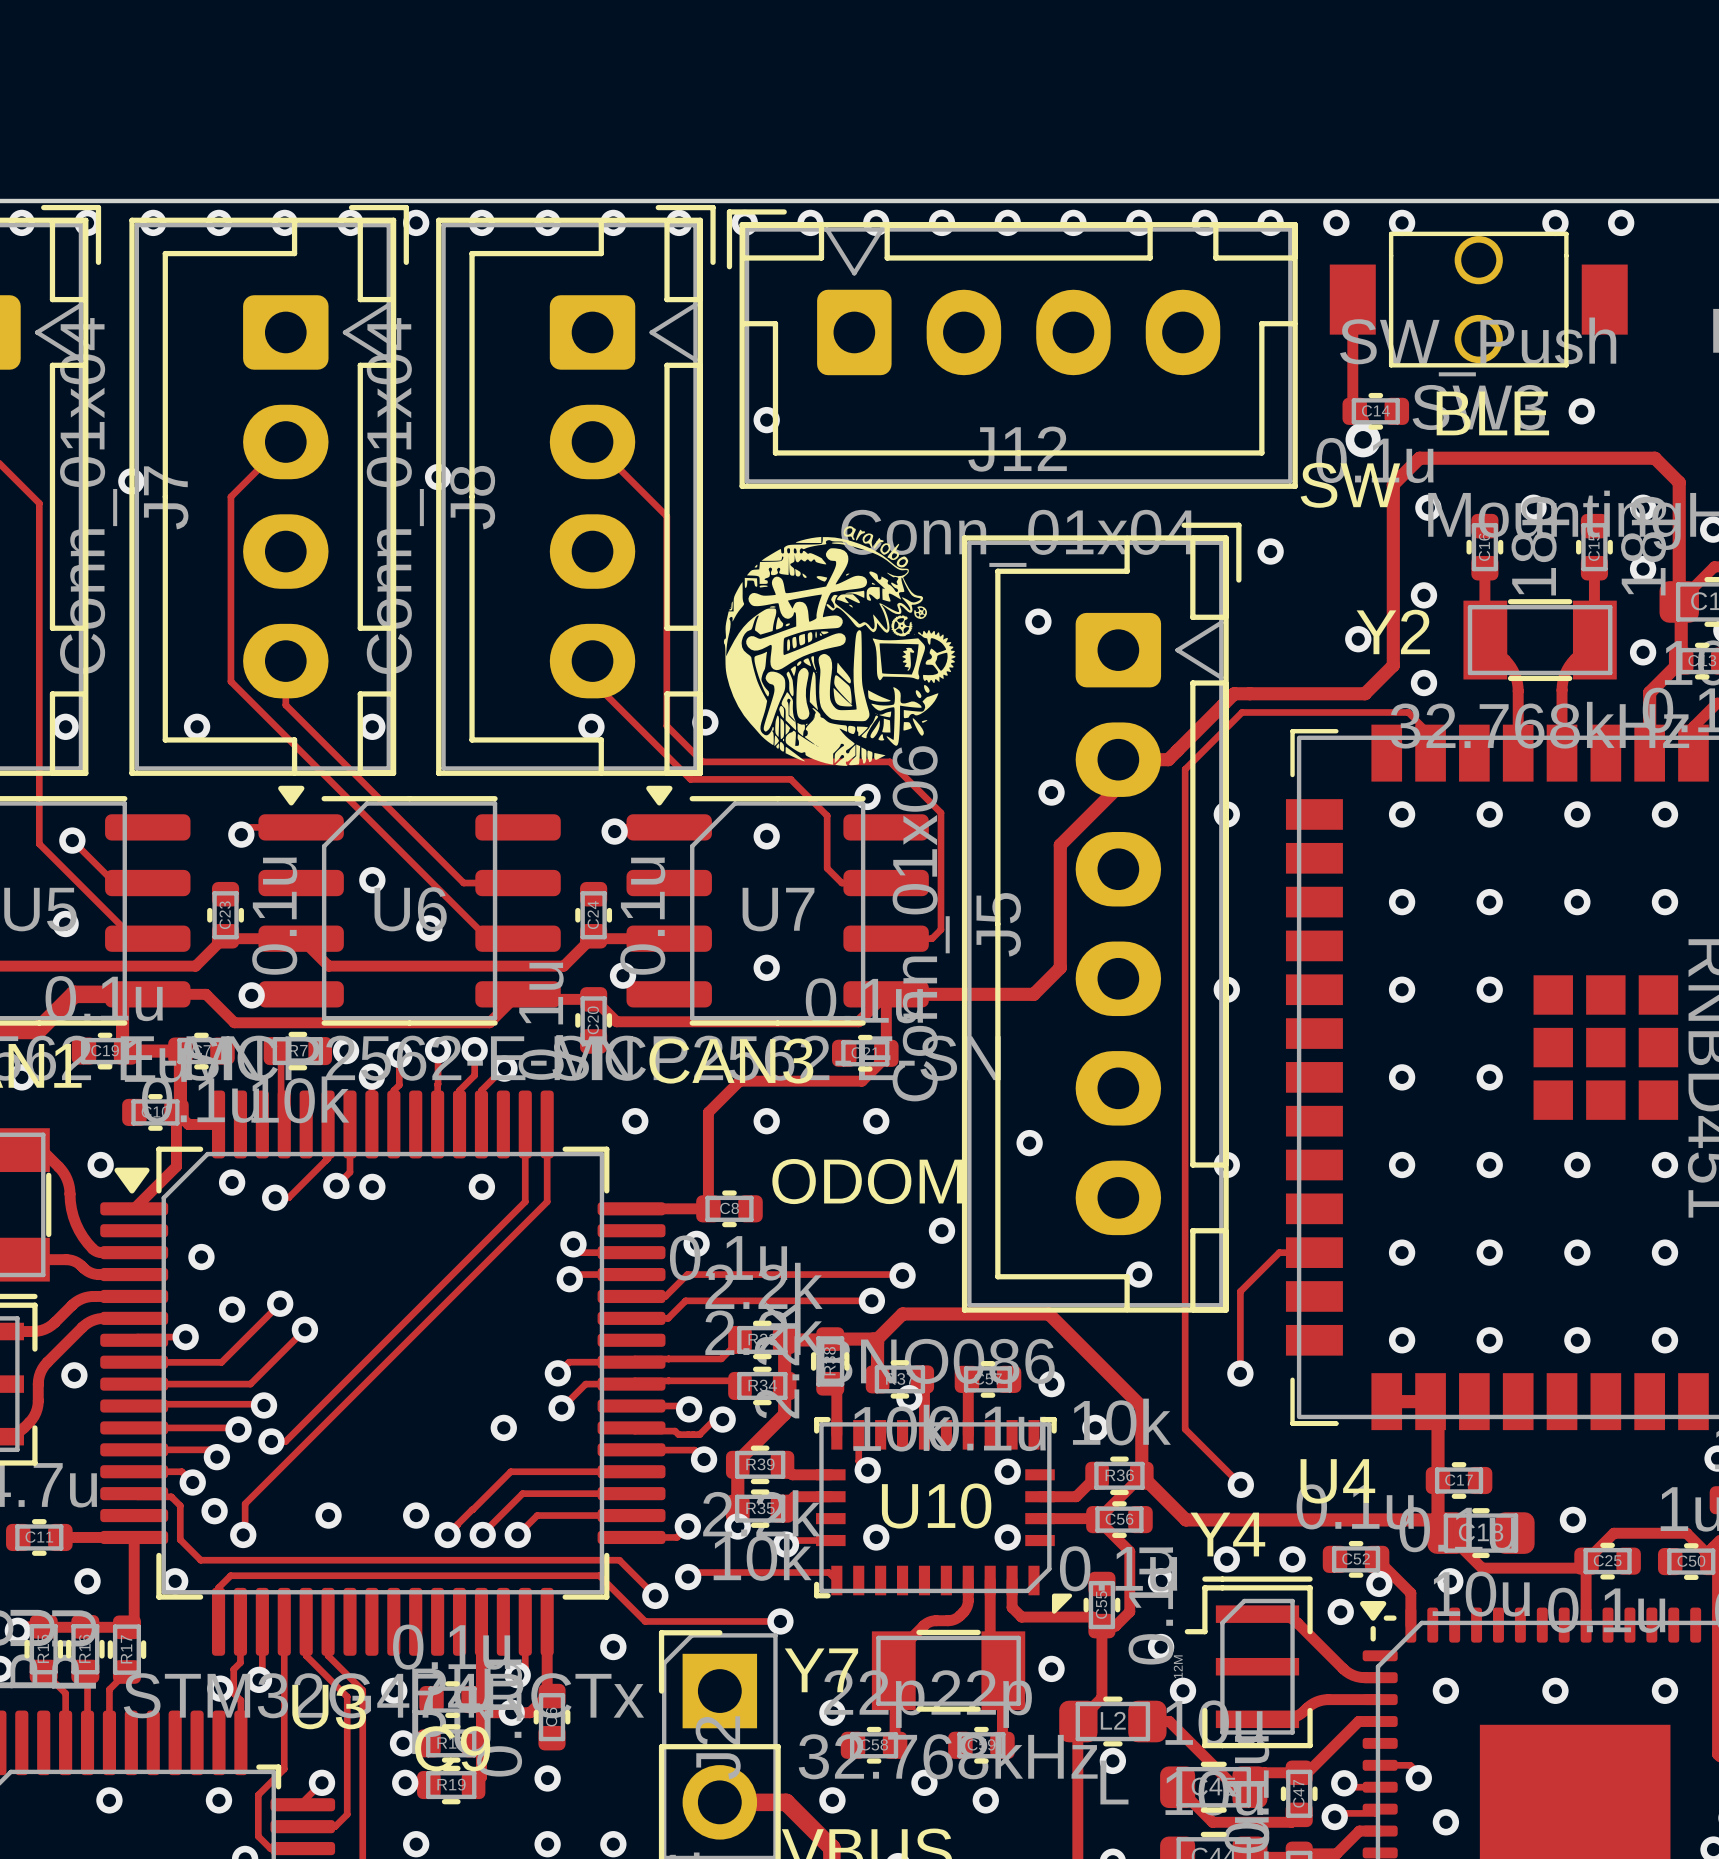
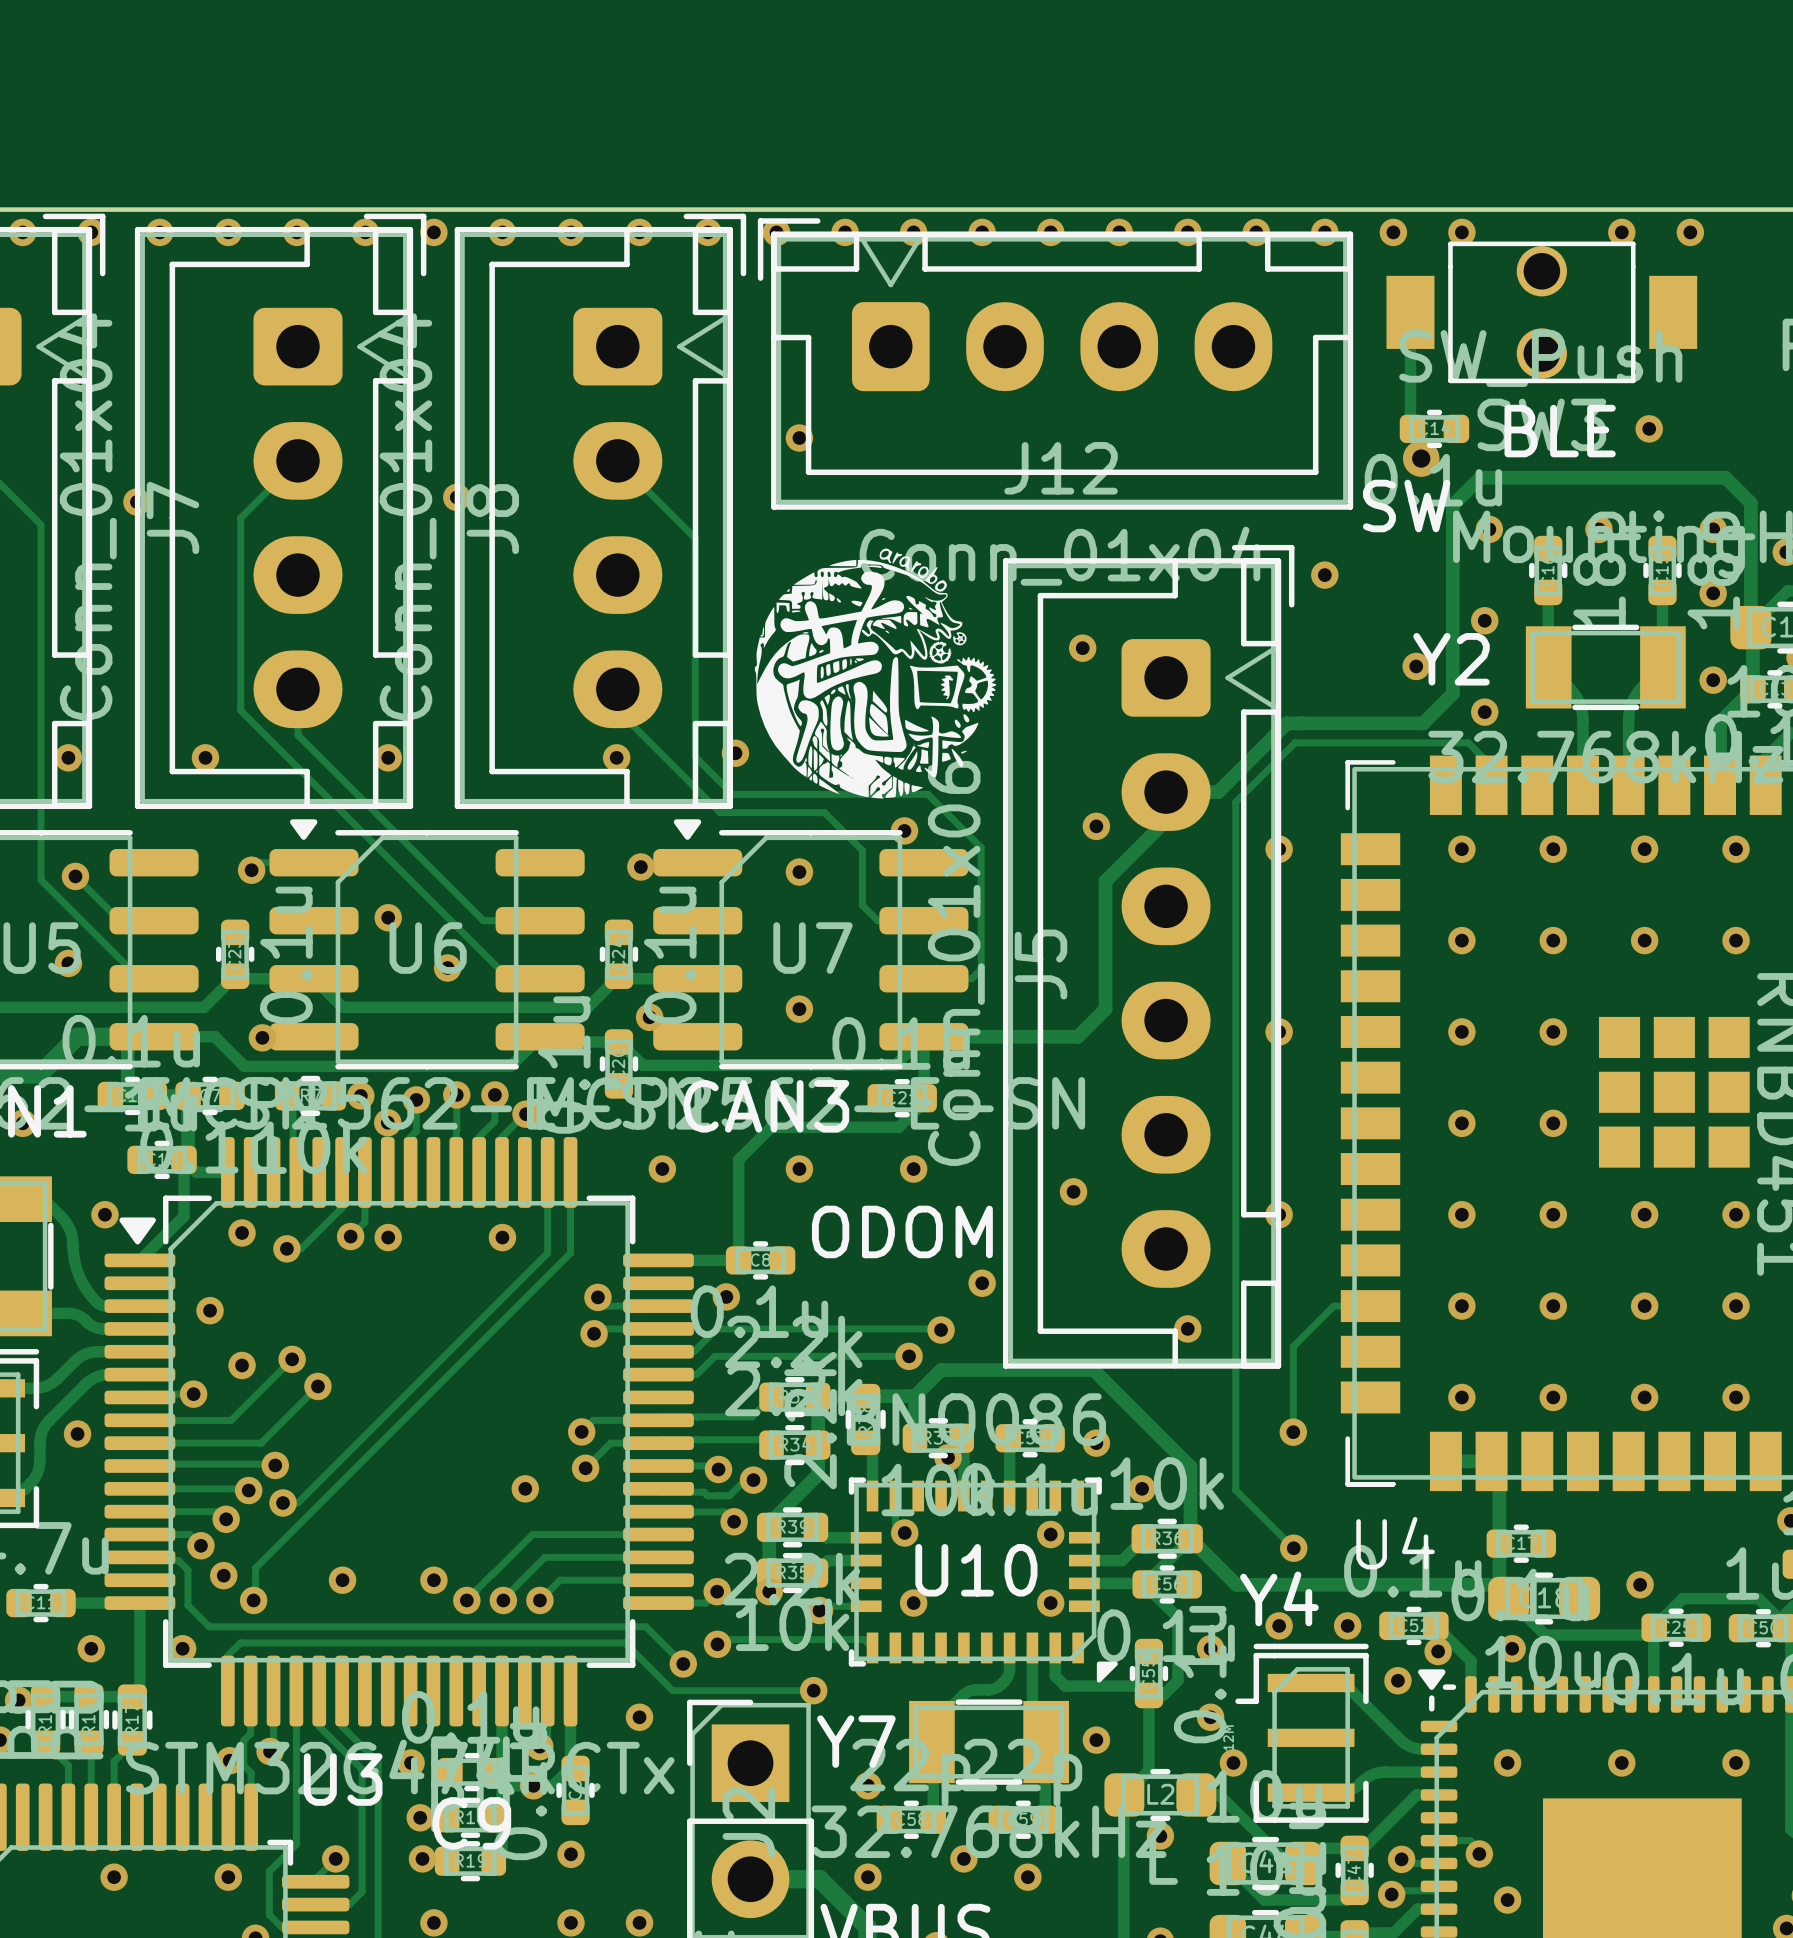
C19 position: (105, 1051) -> (132, 1095)

